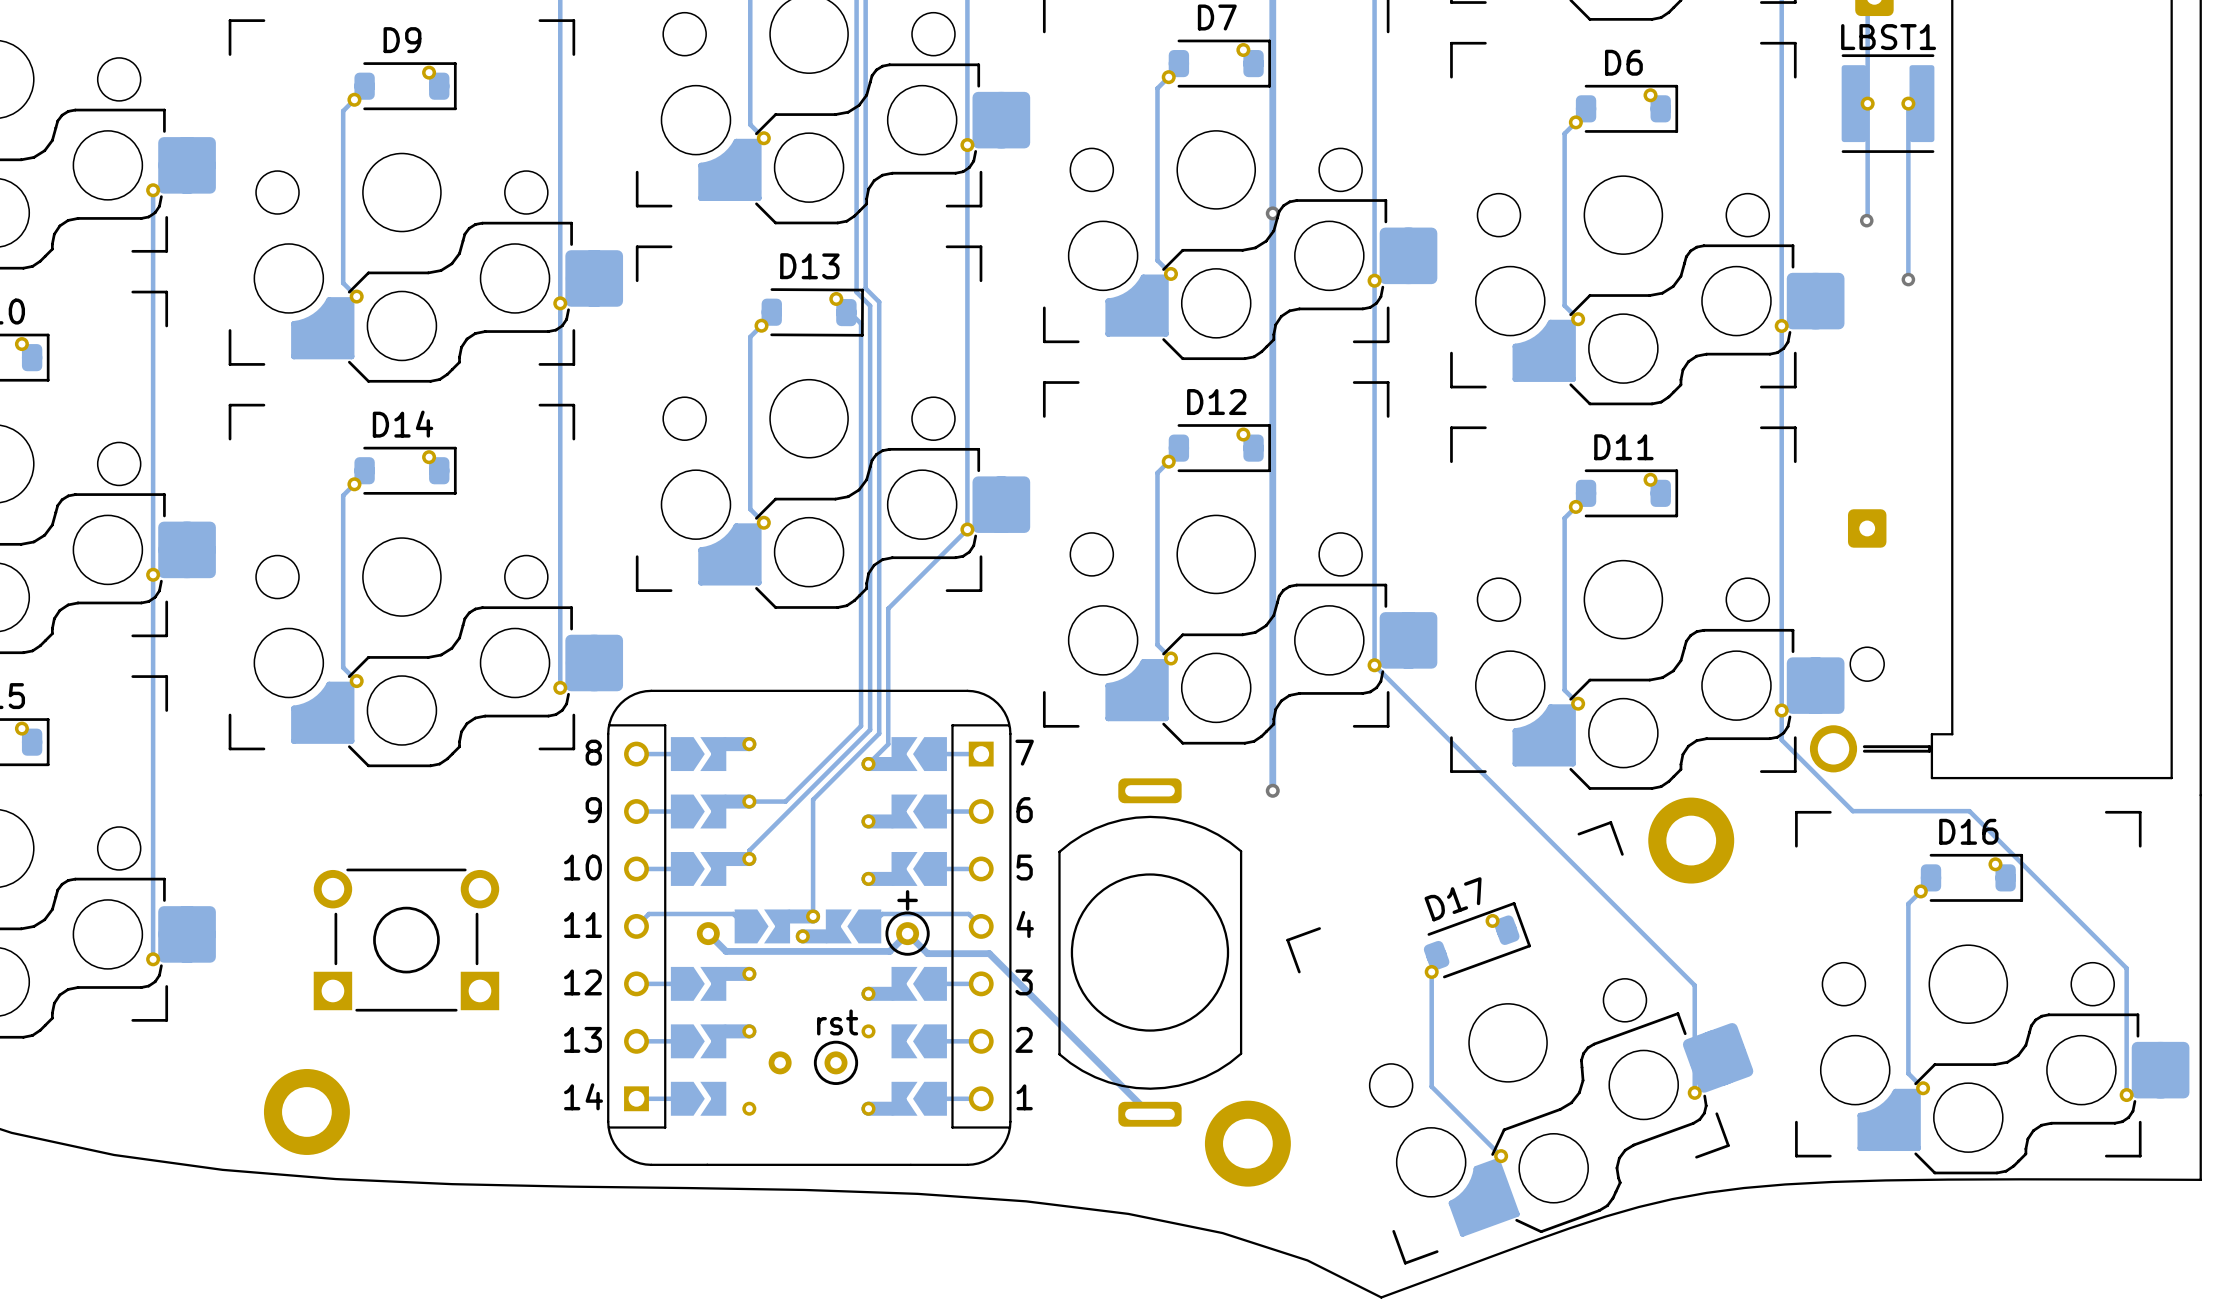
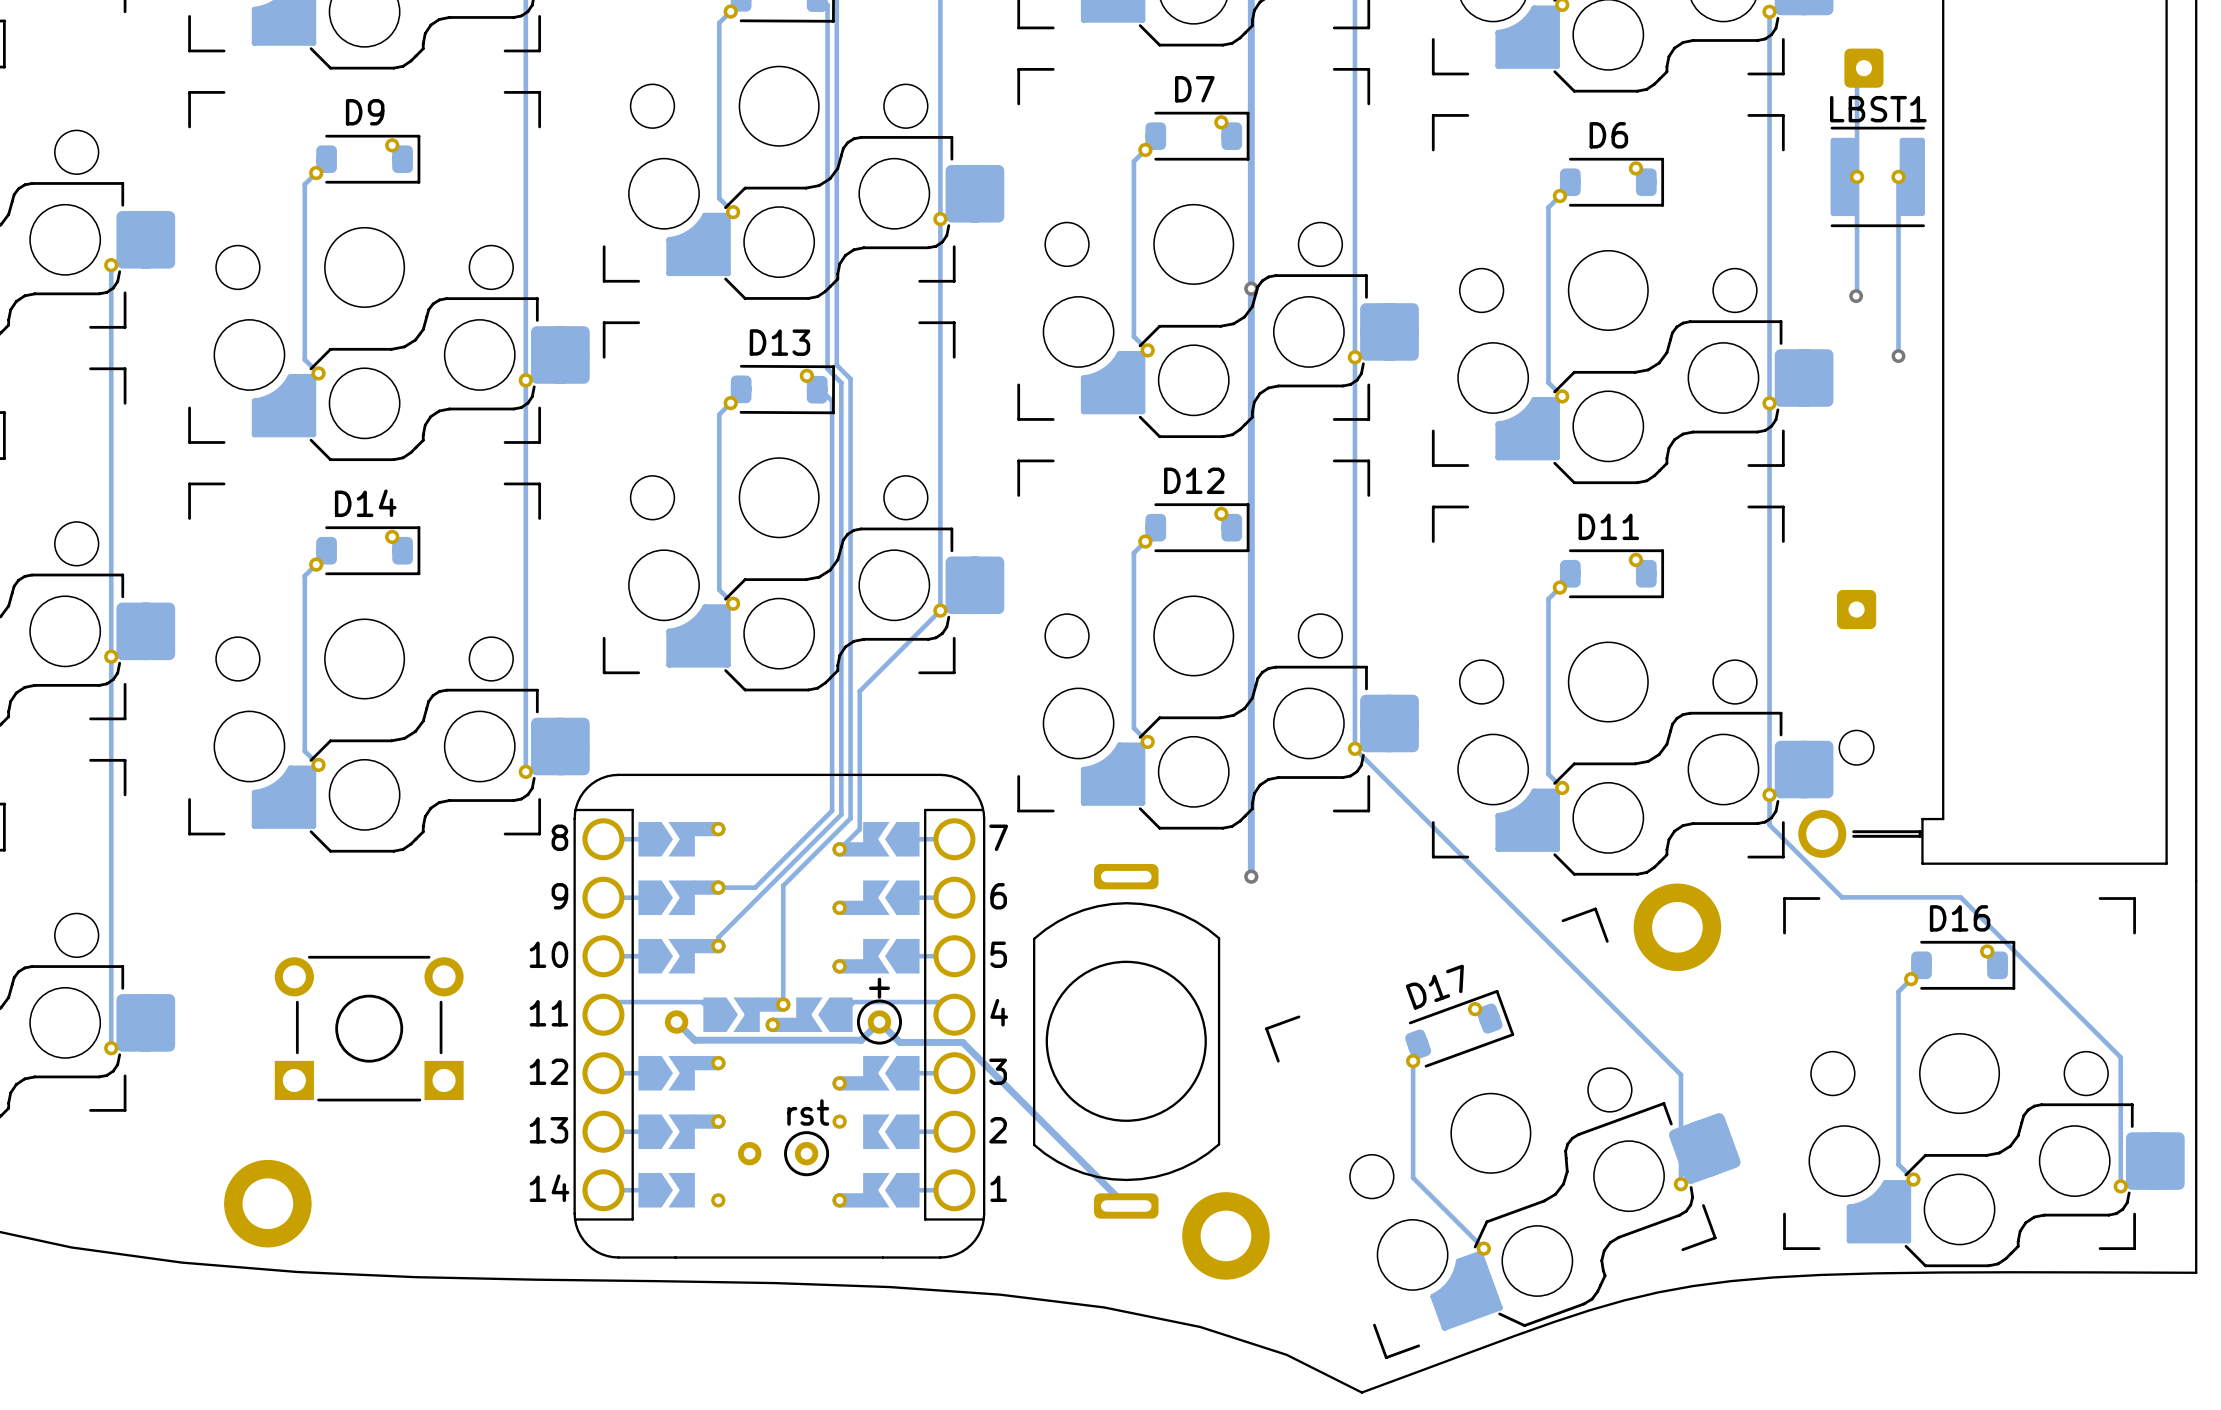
part footprint: [607, 689, 1012, 1166] -> [573, 773, 986, 1259]

